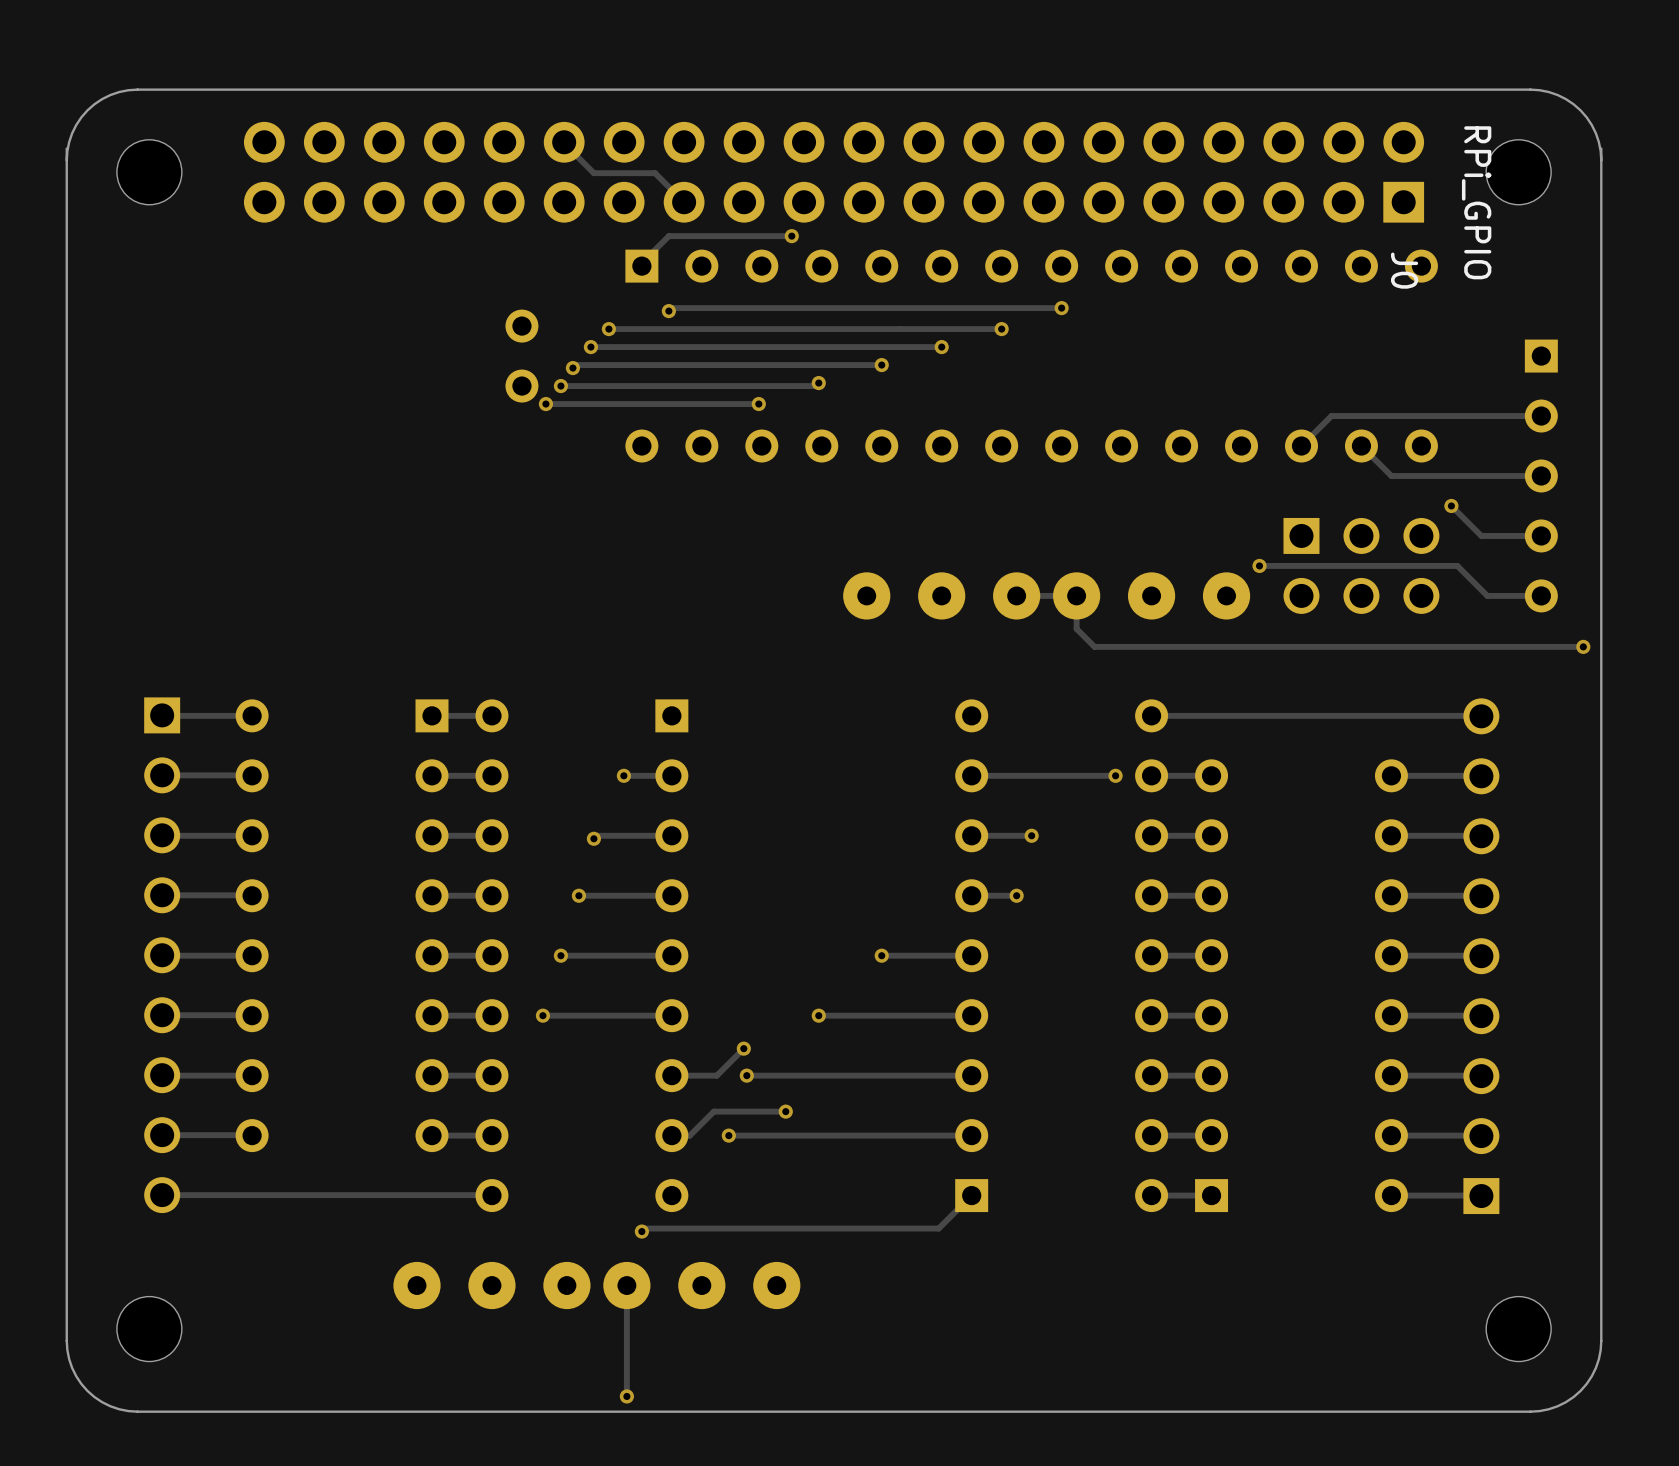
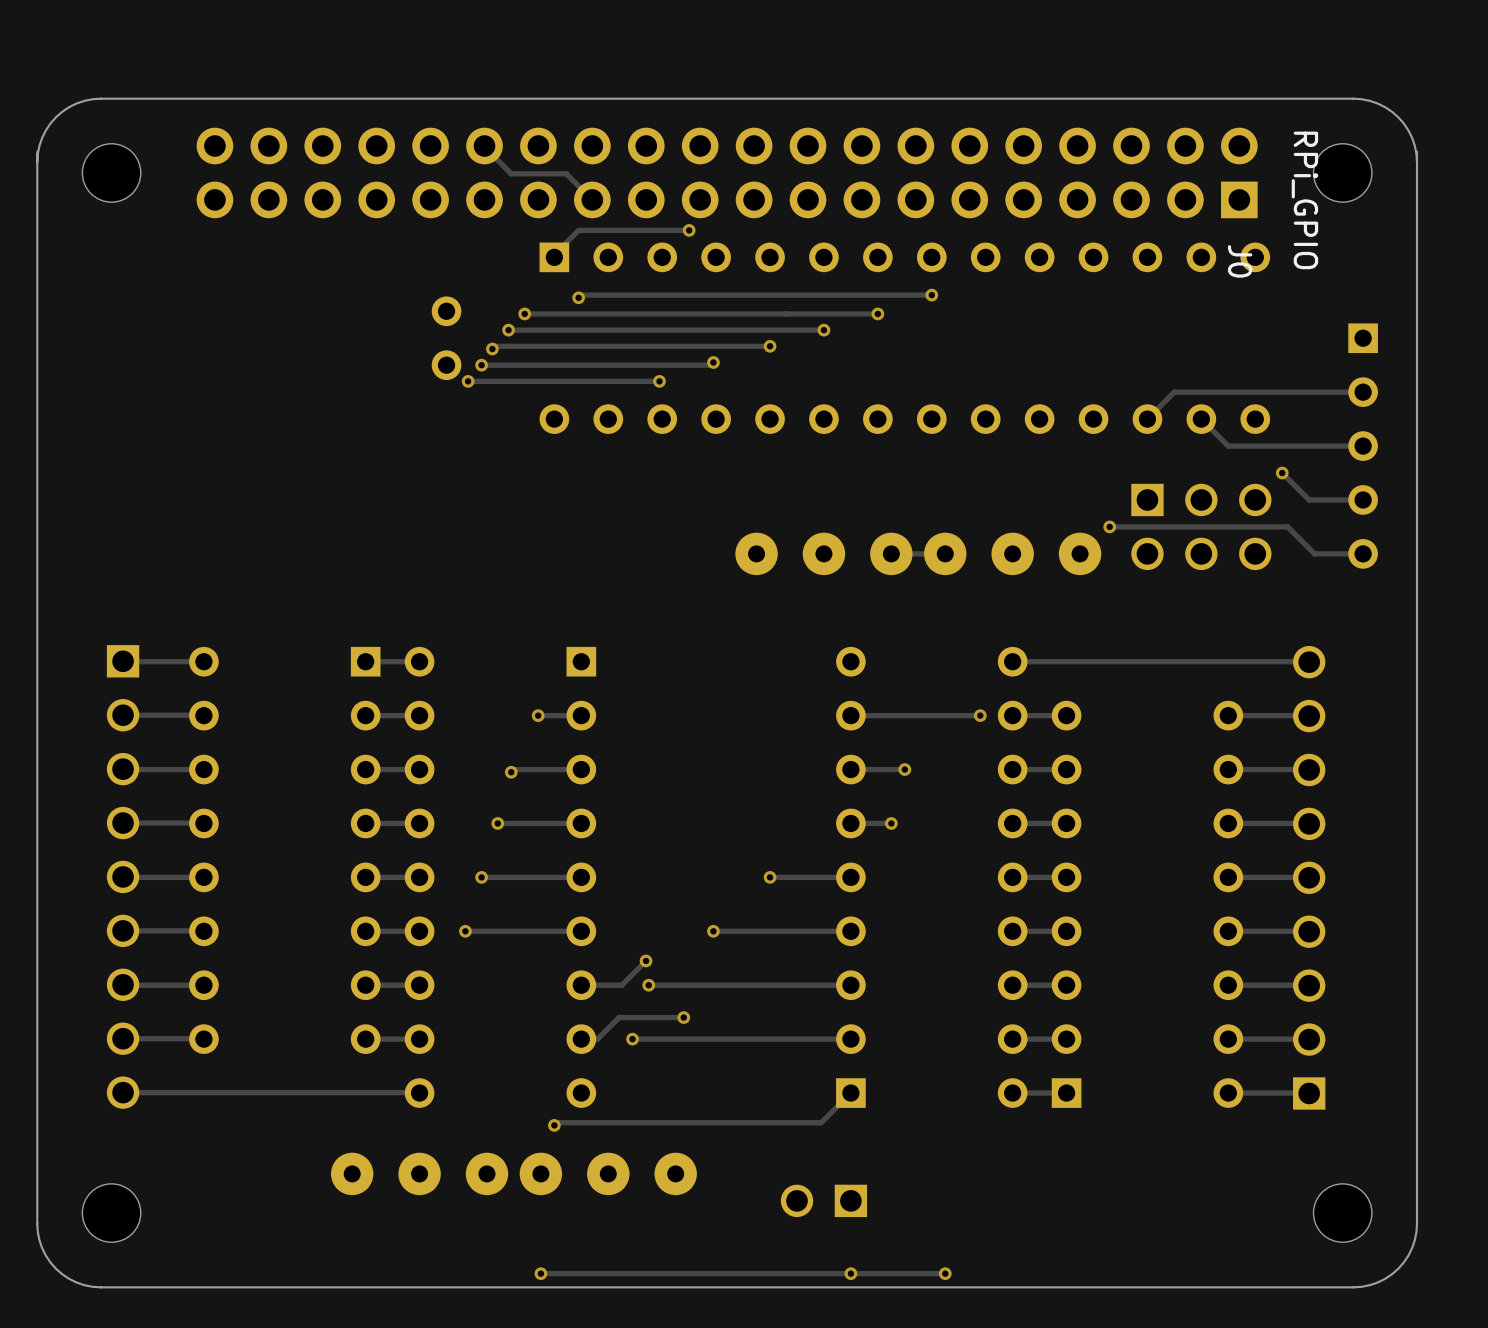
track: (1076, 595) (1076, 628) (1094, 646) (1583, 646) -> none
via: (1583, 646) -> none
track: (626, 1285) (626, 1396) -> (945, 1273) (540, 1273)
part: none -> (823, 1200)
via: none -> (850, 1273)
via: none -> (945, 1273)

